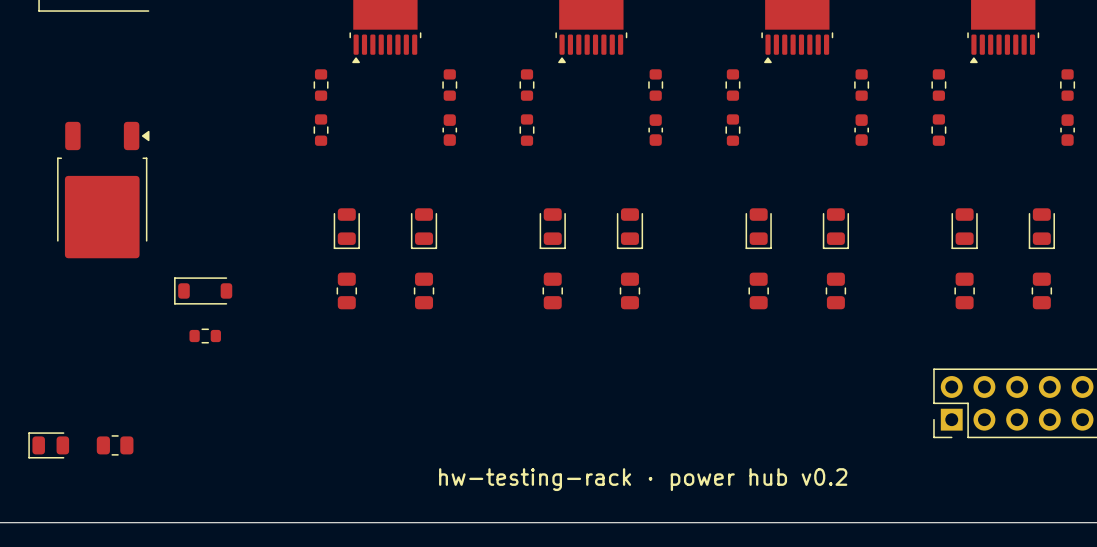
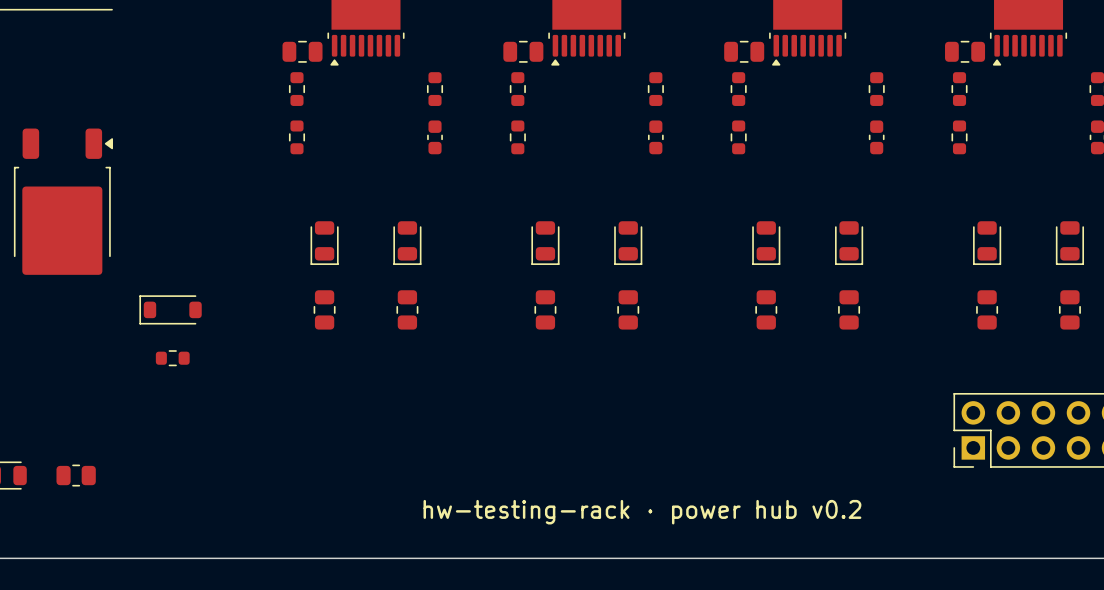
part: none -> (302, 51)
part: none -> (523, 51)
part: none -> (744, 51)
part: none -> (965, 51)

